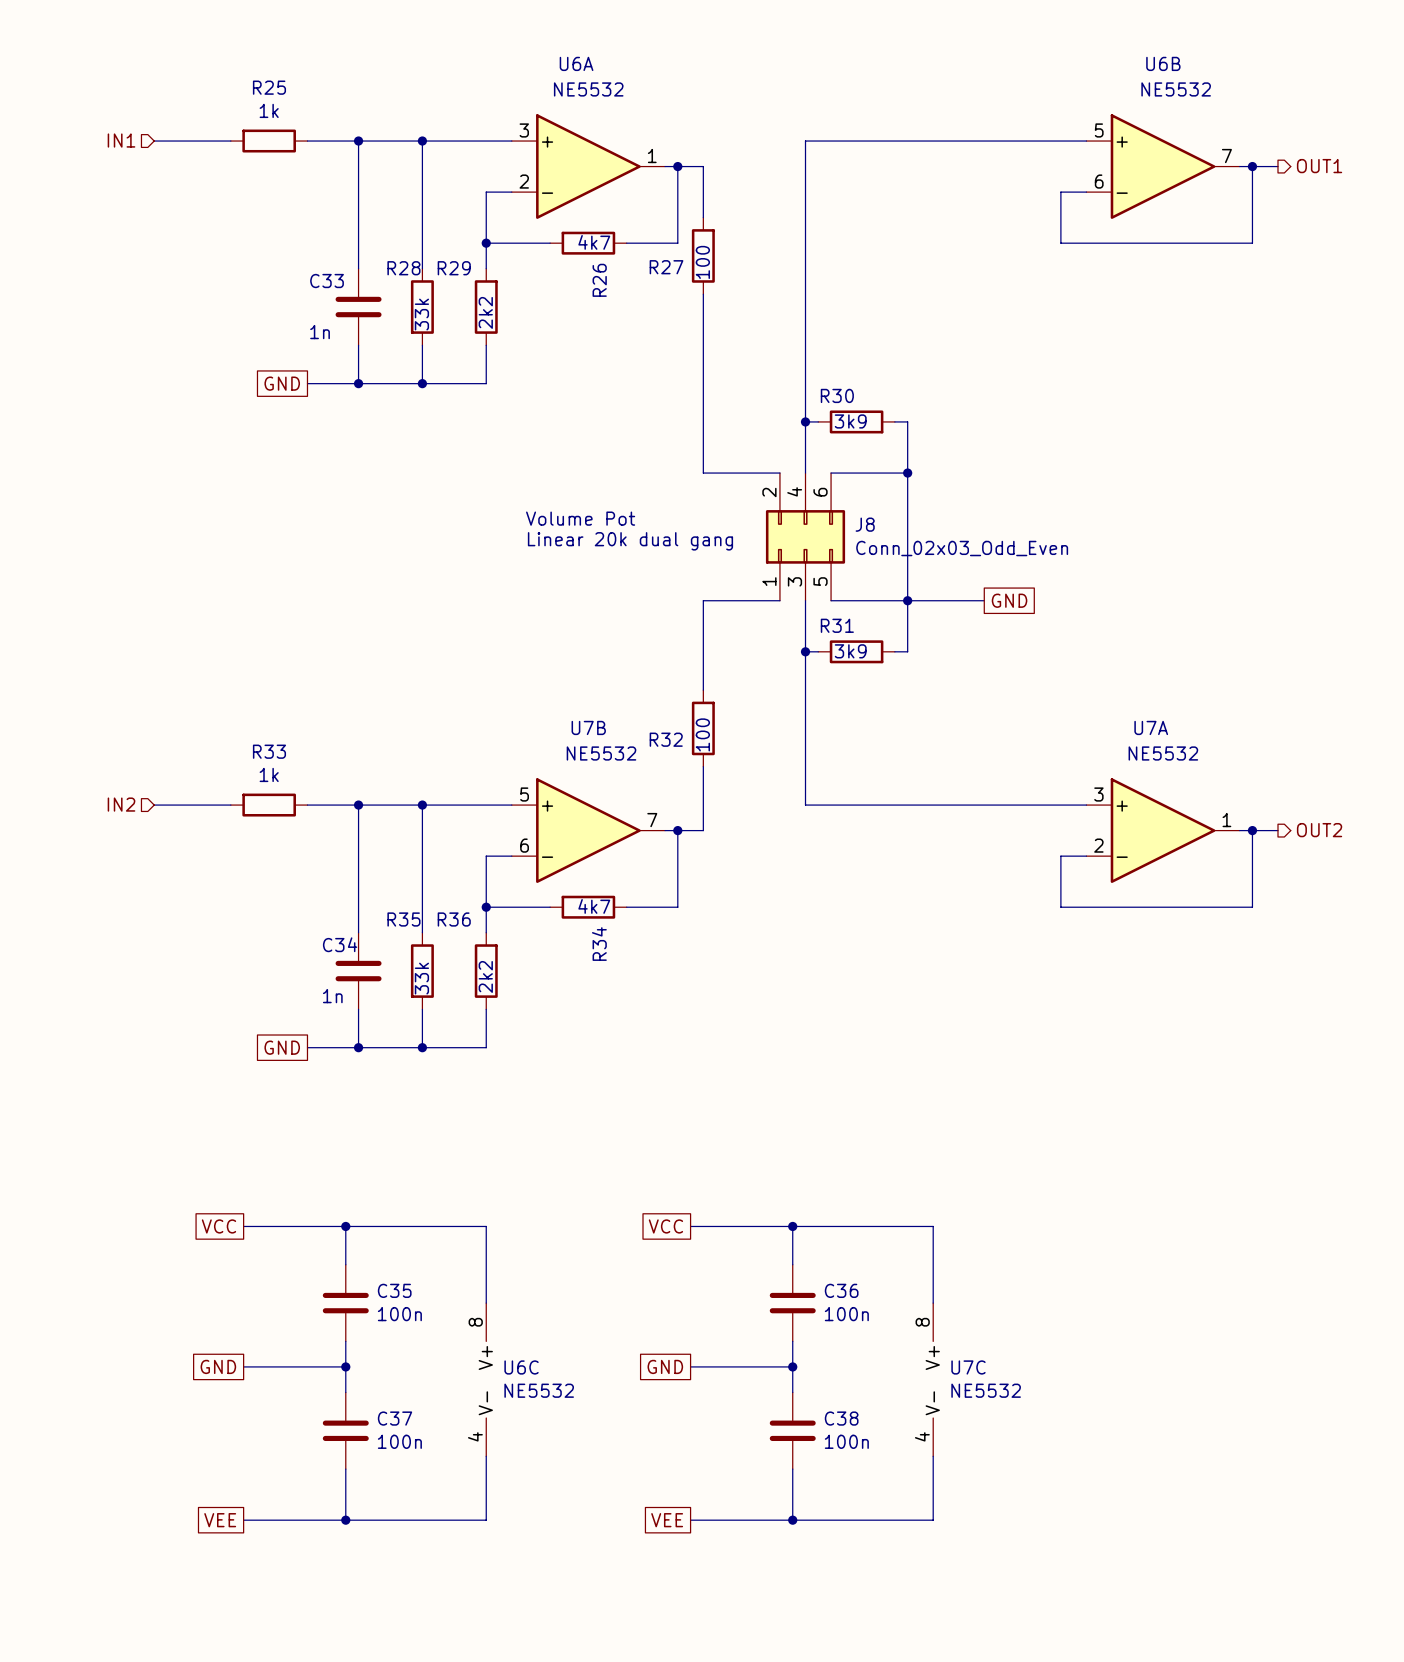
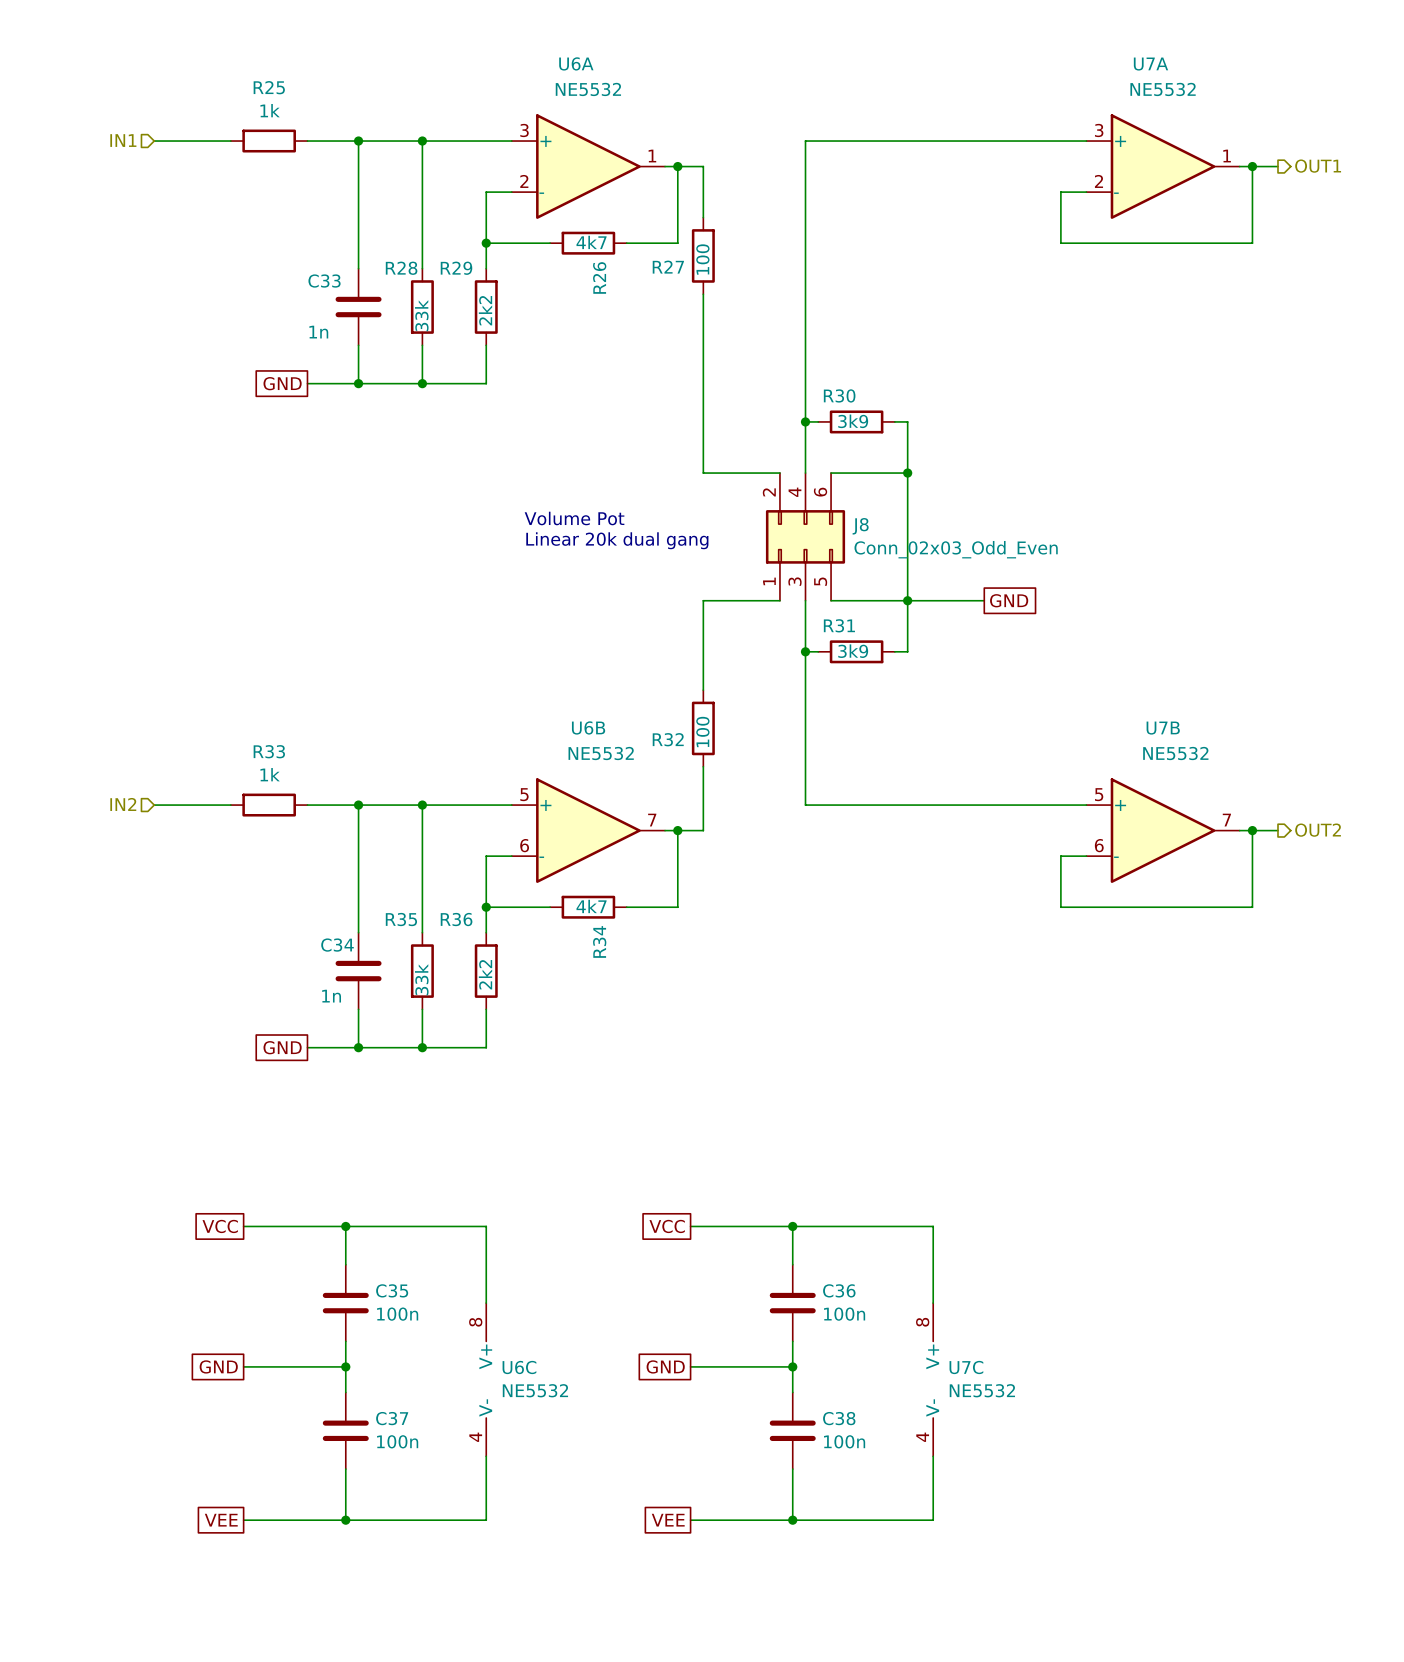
U6B: NE5532 (1163, 166) -> none
U7B name: U7B (588, 727) -> U6B (588, 727)
U7A position: (1163, 830) -> (1163, 166)
U7B: none -> NE5532 (1163, 830)

